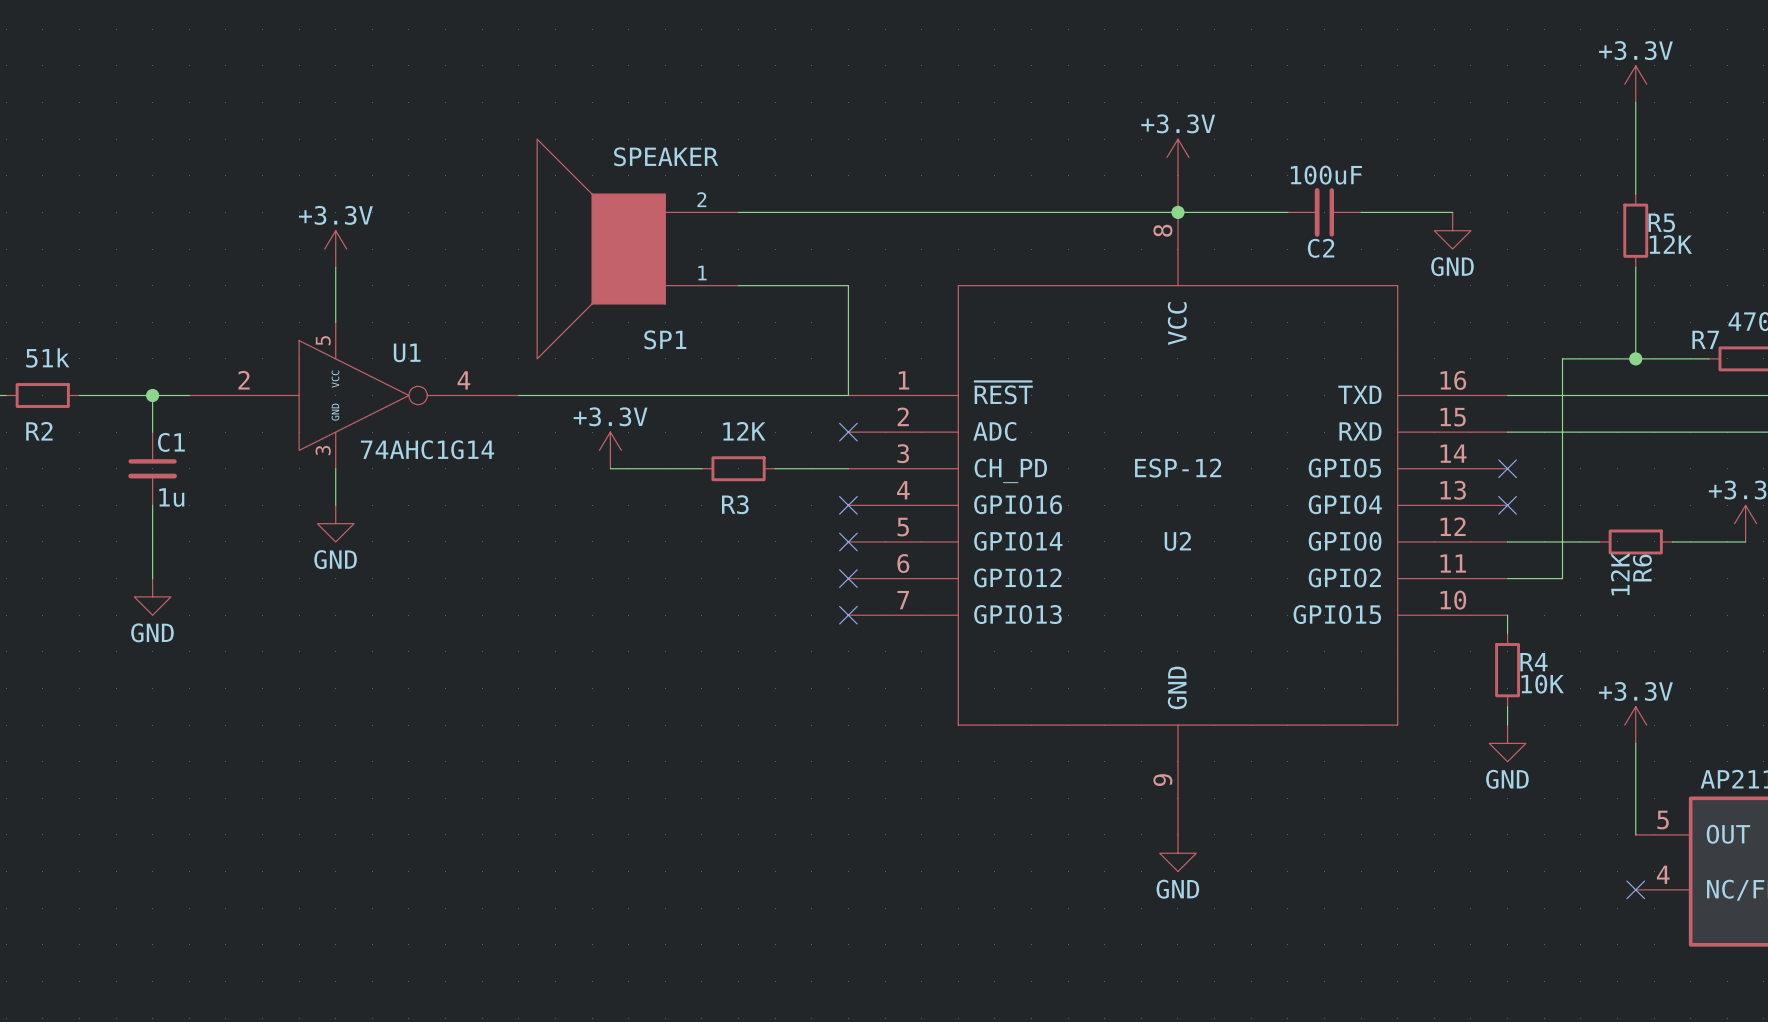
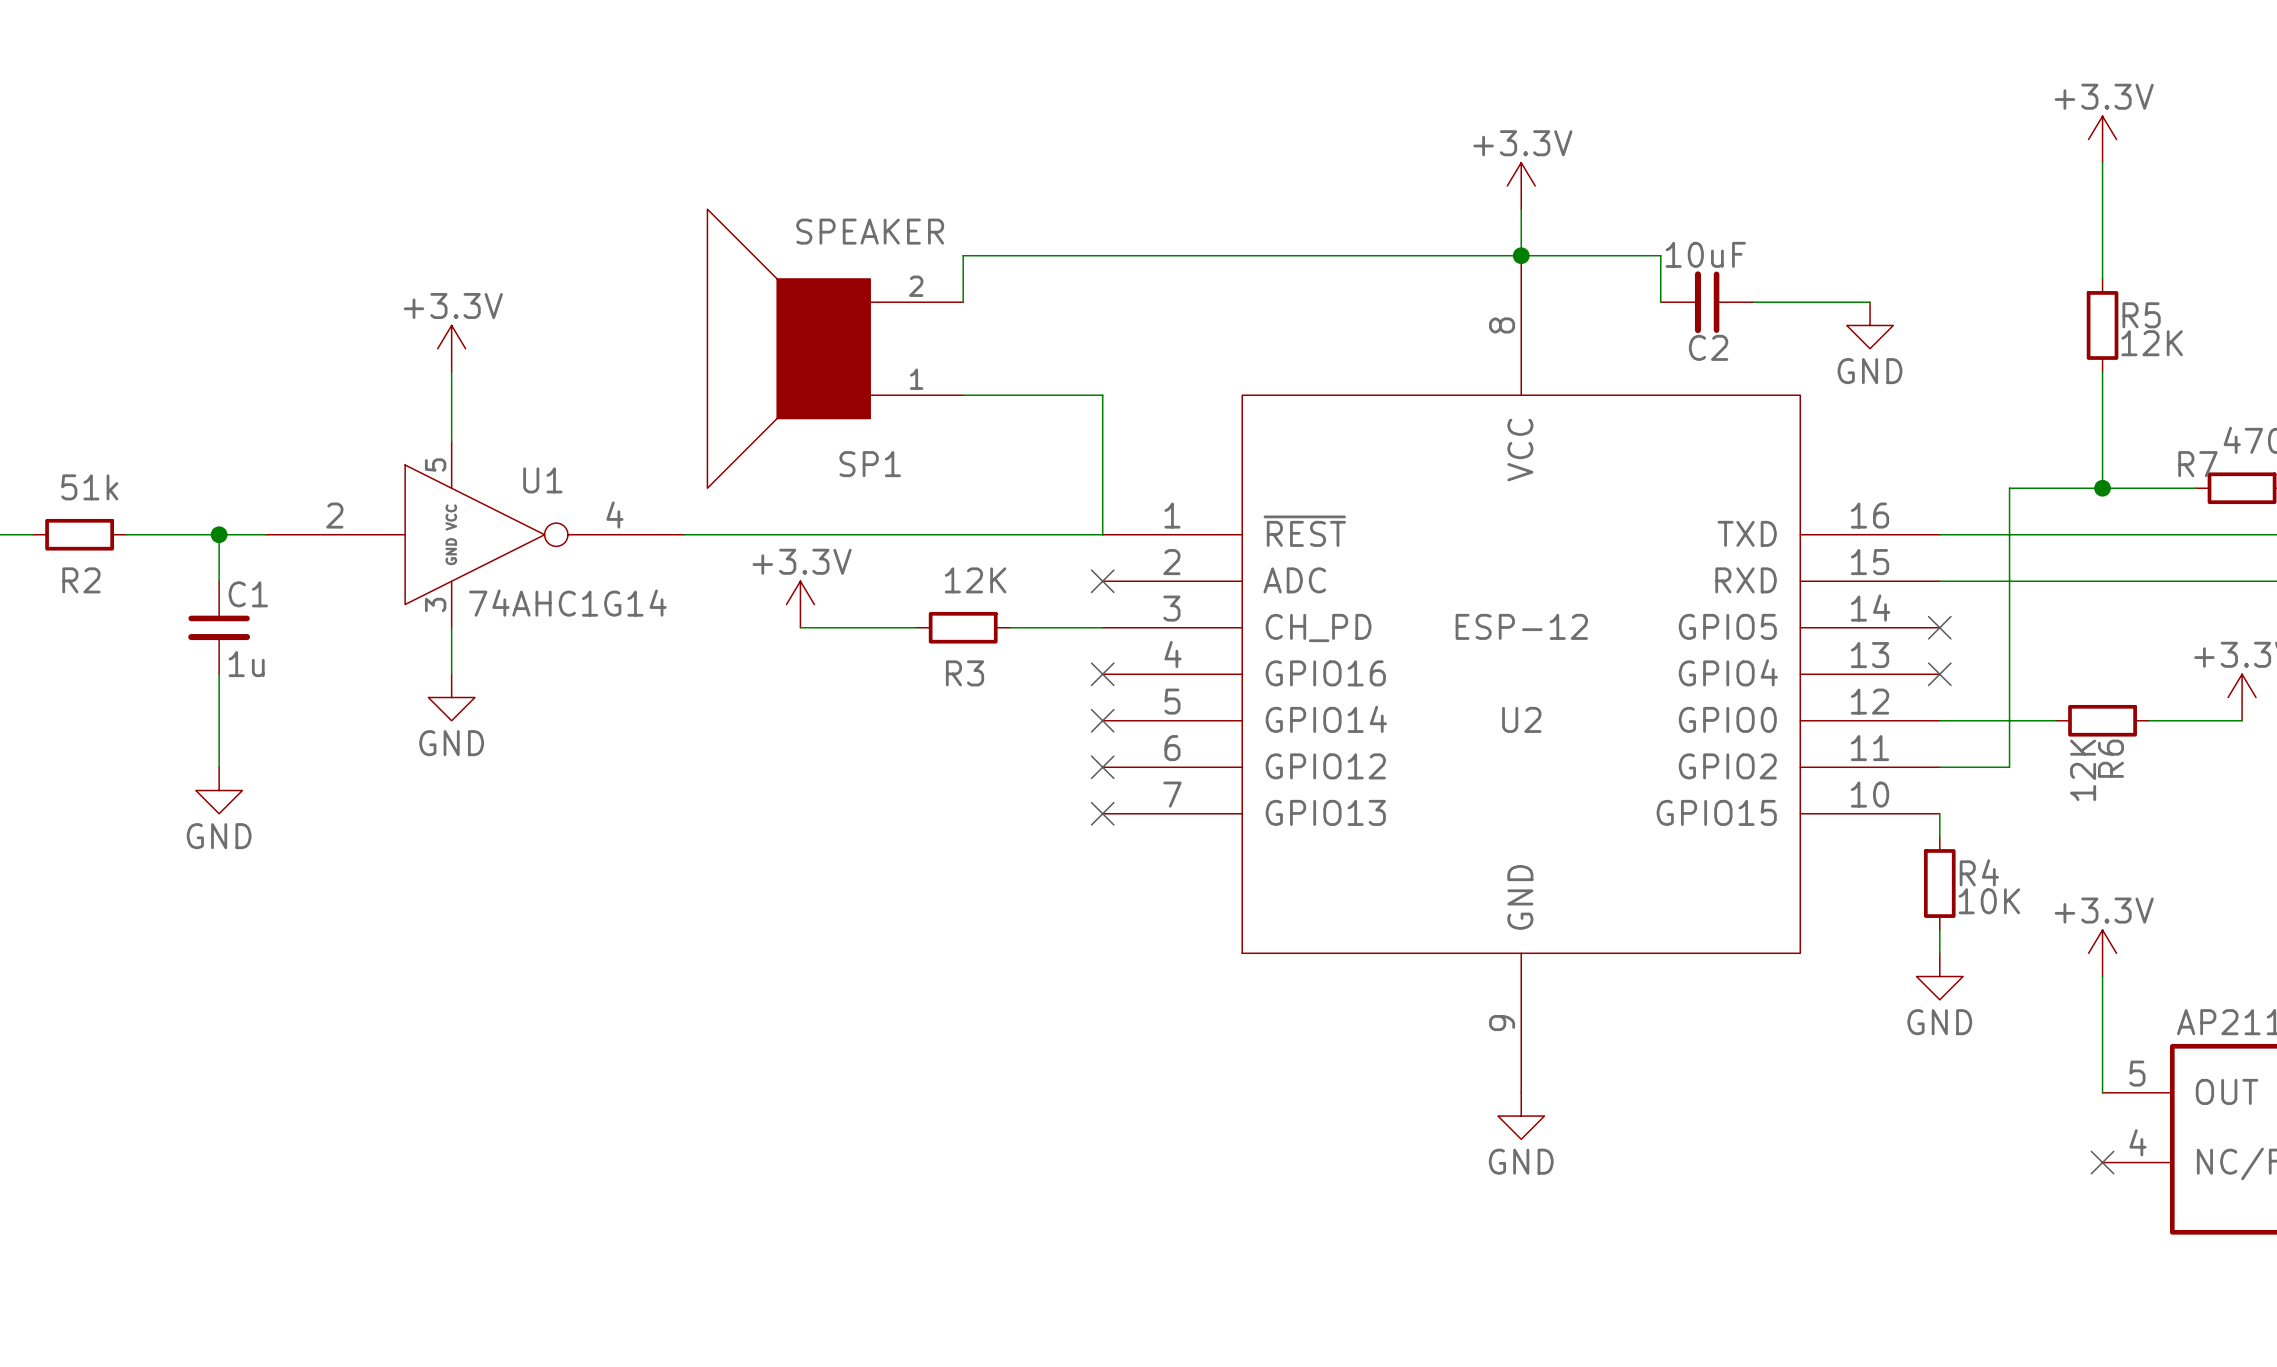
power symbol position: +3.3V (1177, 157) -> +3.3V (1521, 185)
C2 value: 100uF (1326, 175) -> 10uF (1705, 254)
wire: (738, 212) (1287, 212) -> (963, 302) (963, 255) (1660, 255) (1660, 302)
junction position: (1177, 212) -> (1521, 255)

